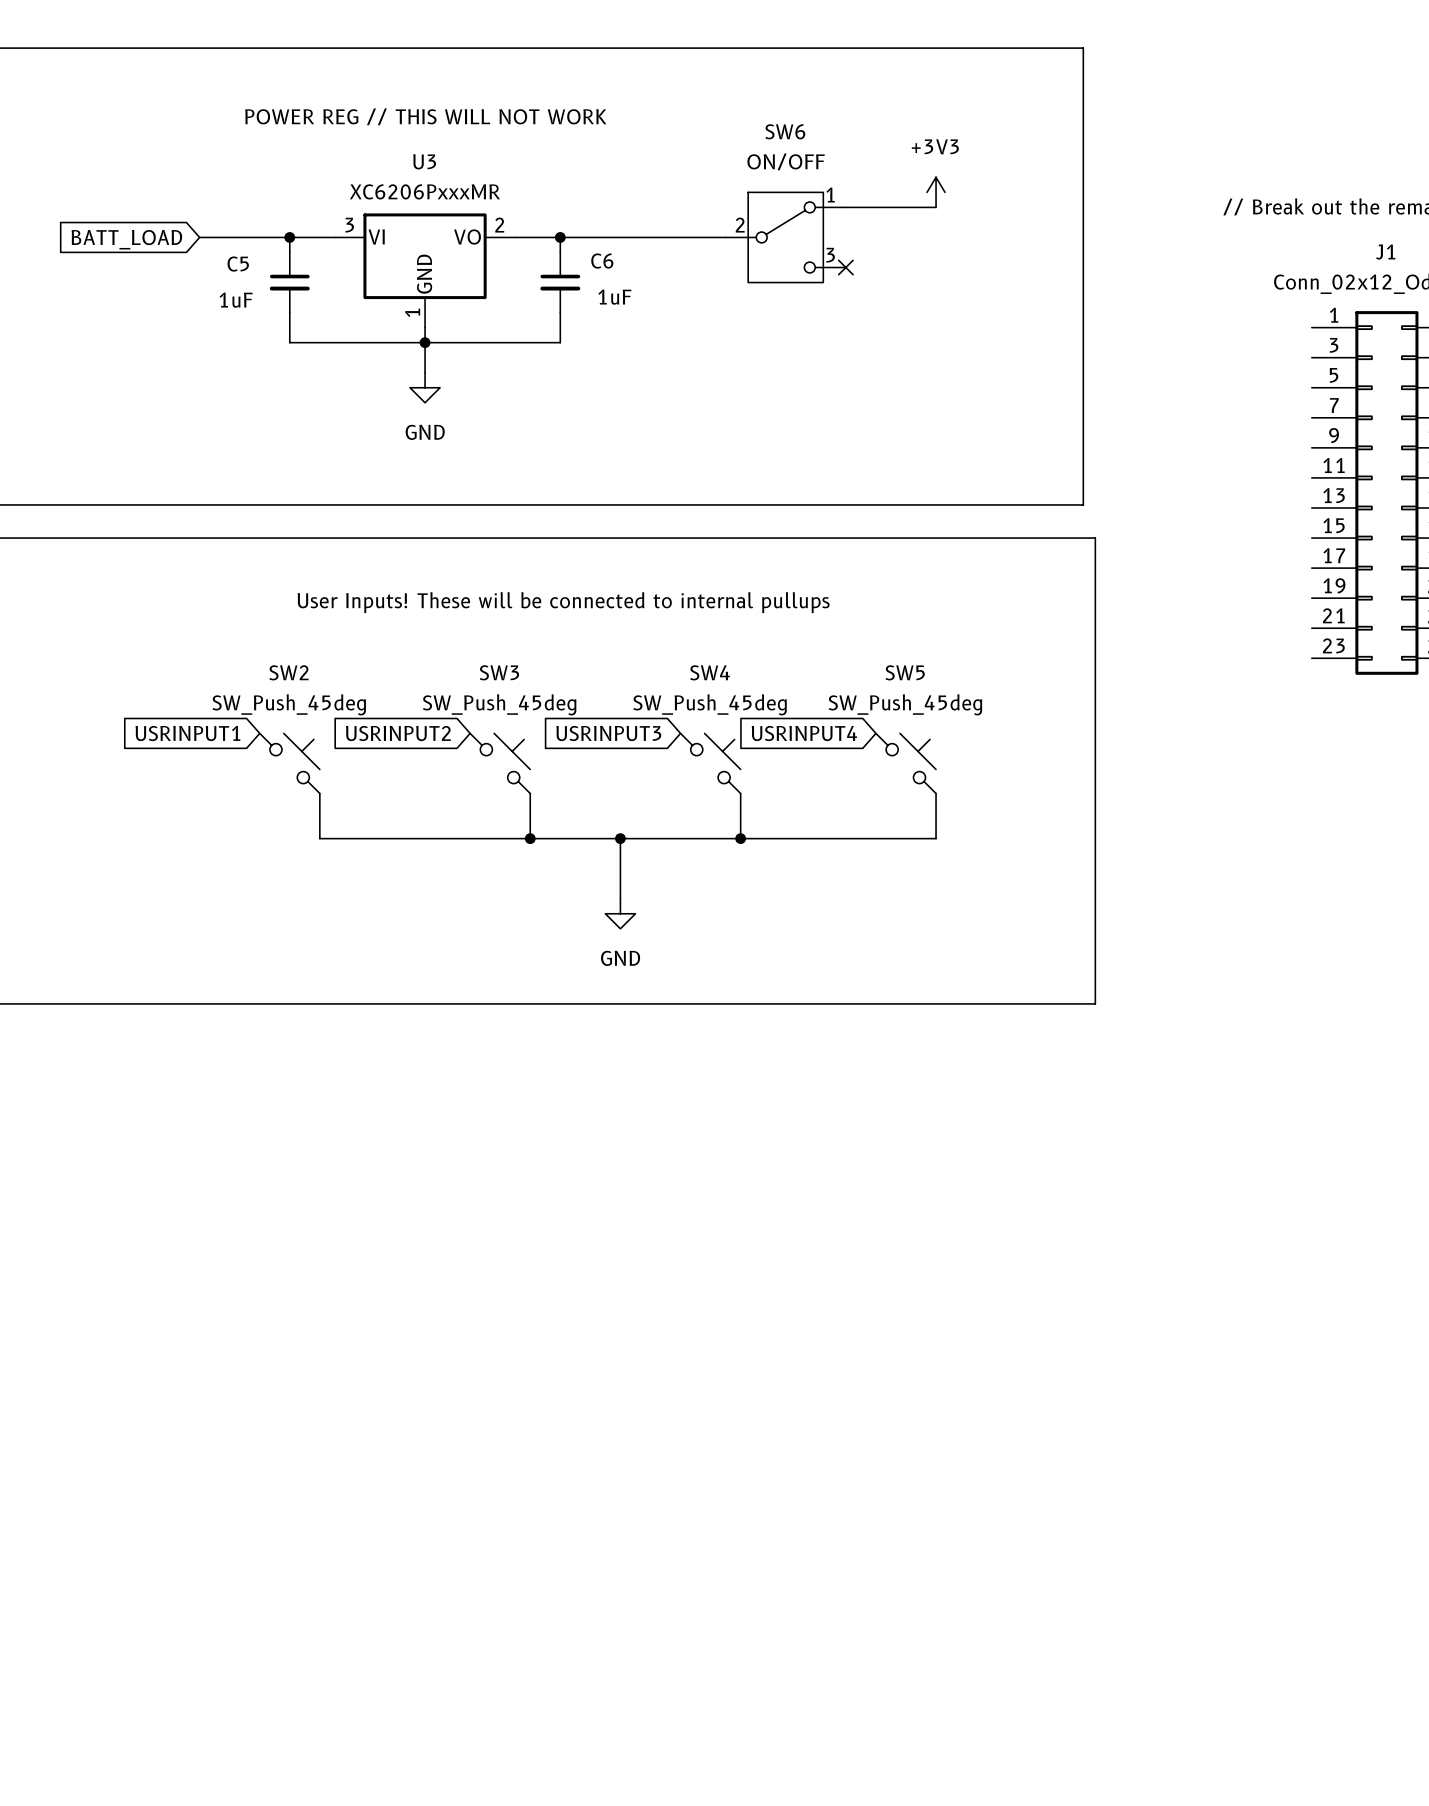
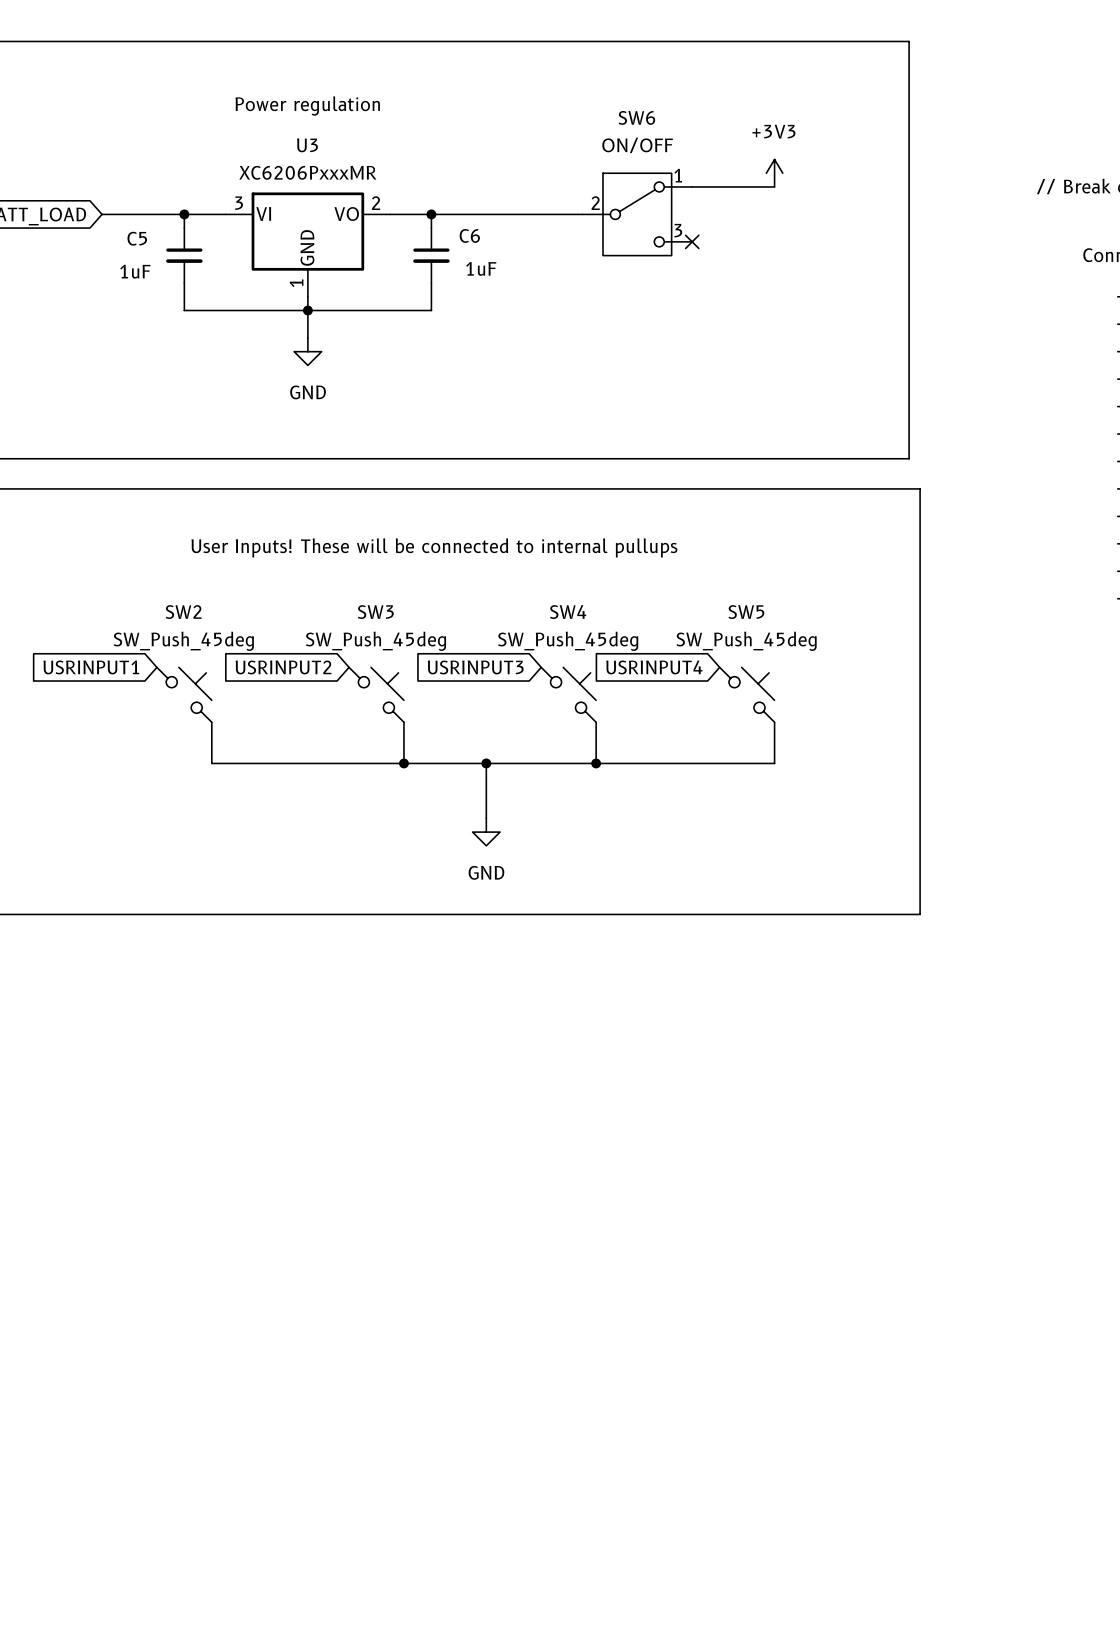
text: POWER REG // THIS WILL NOT WORK (425, 116) -> Power regulation (307, 106)

